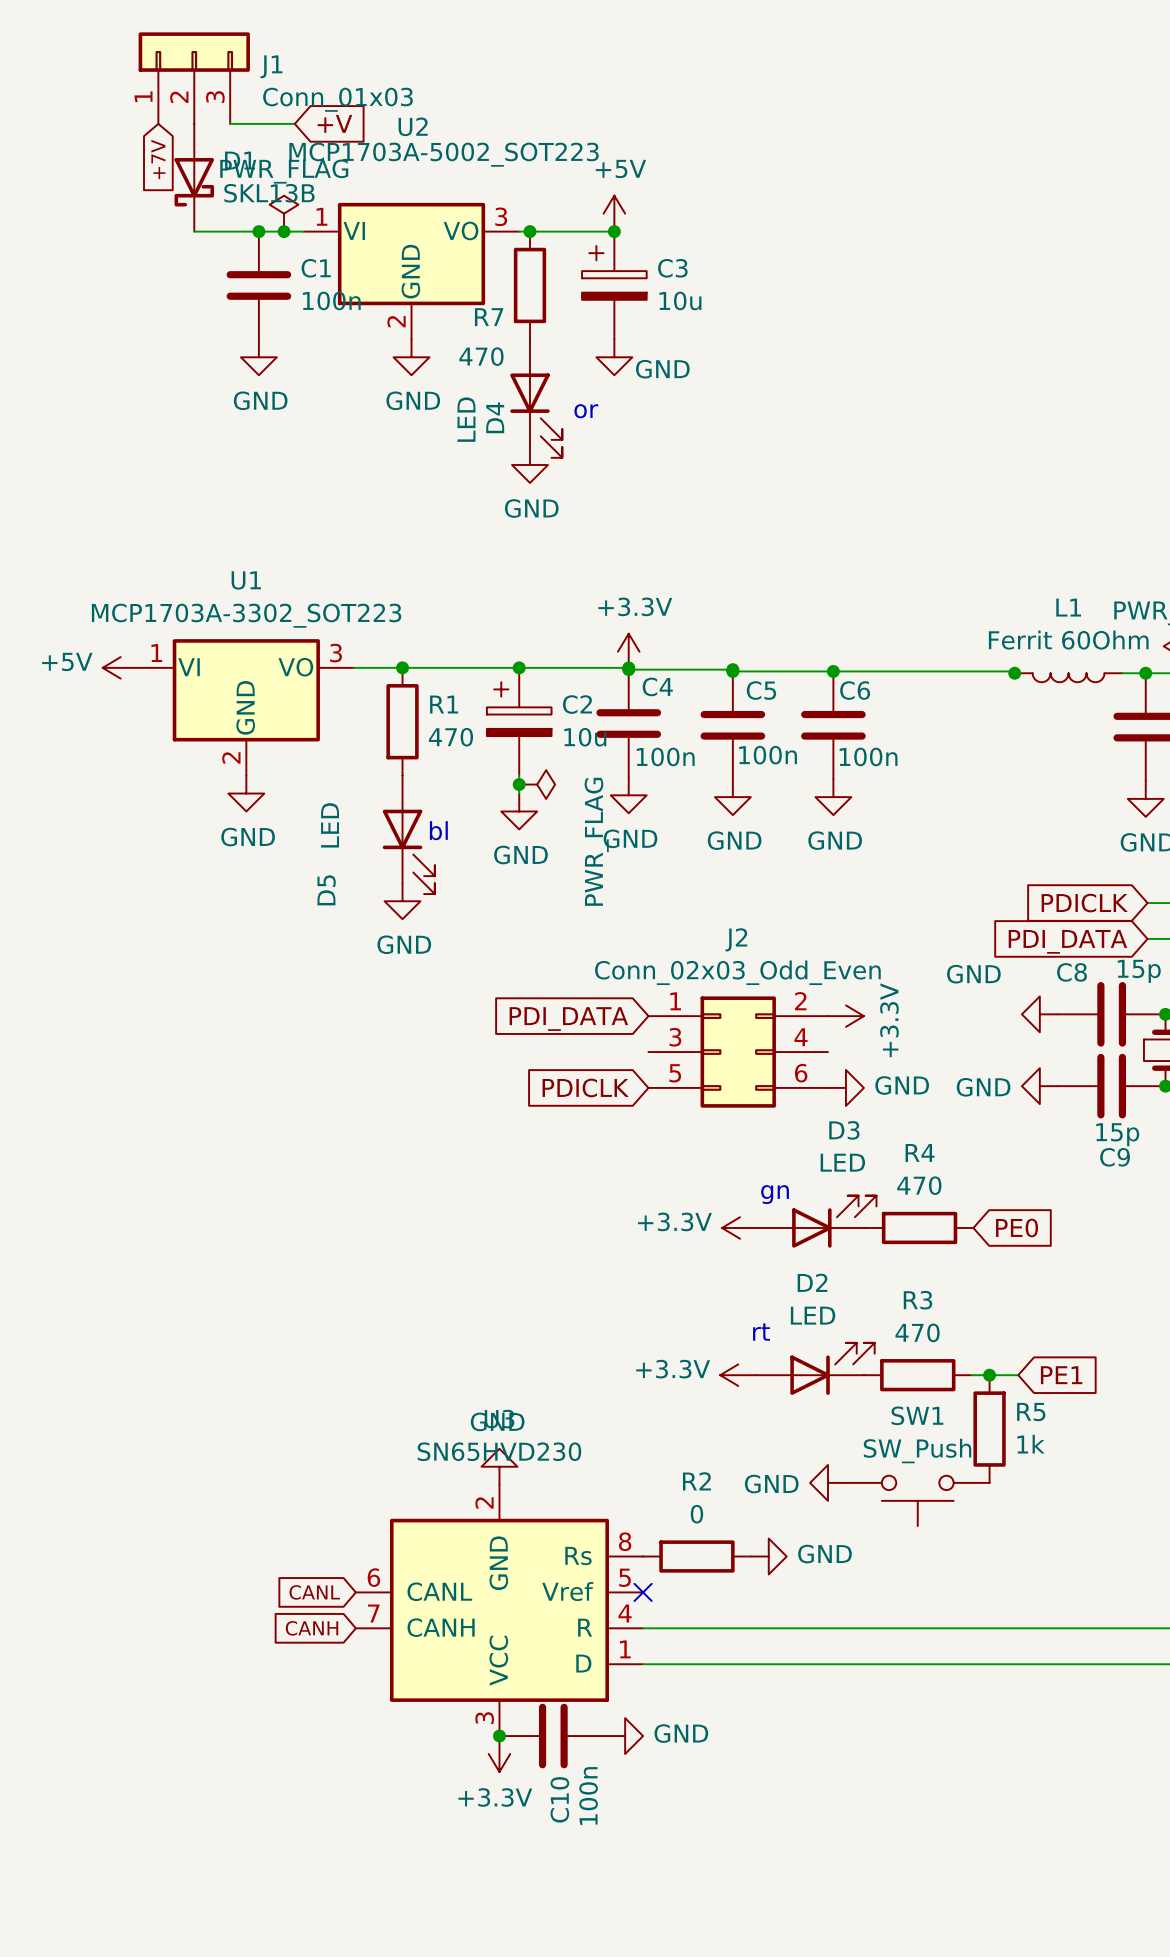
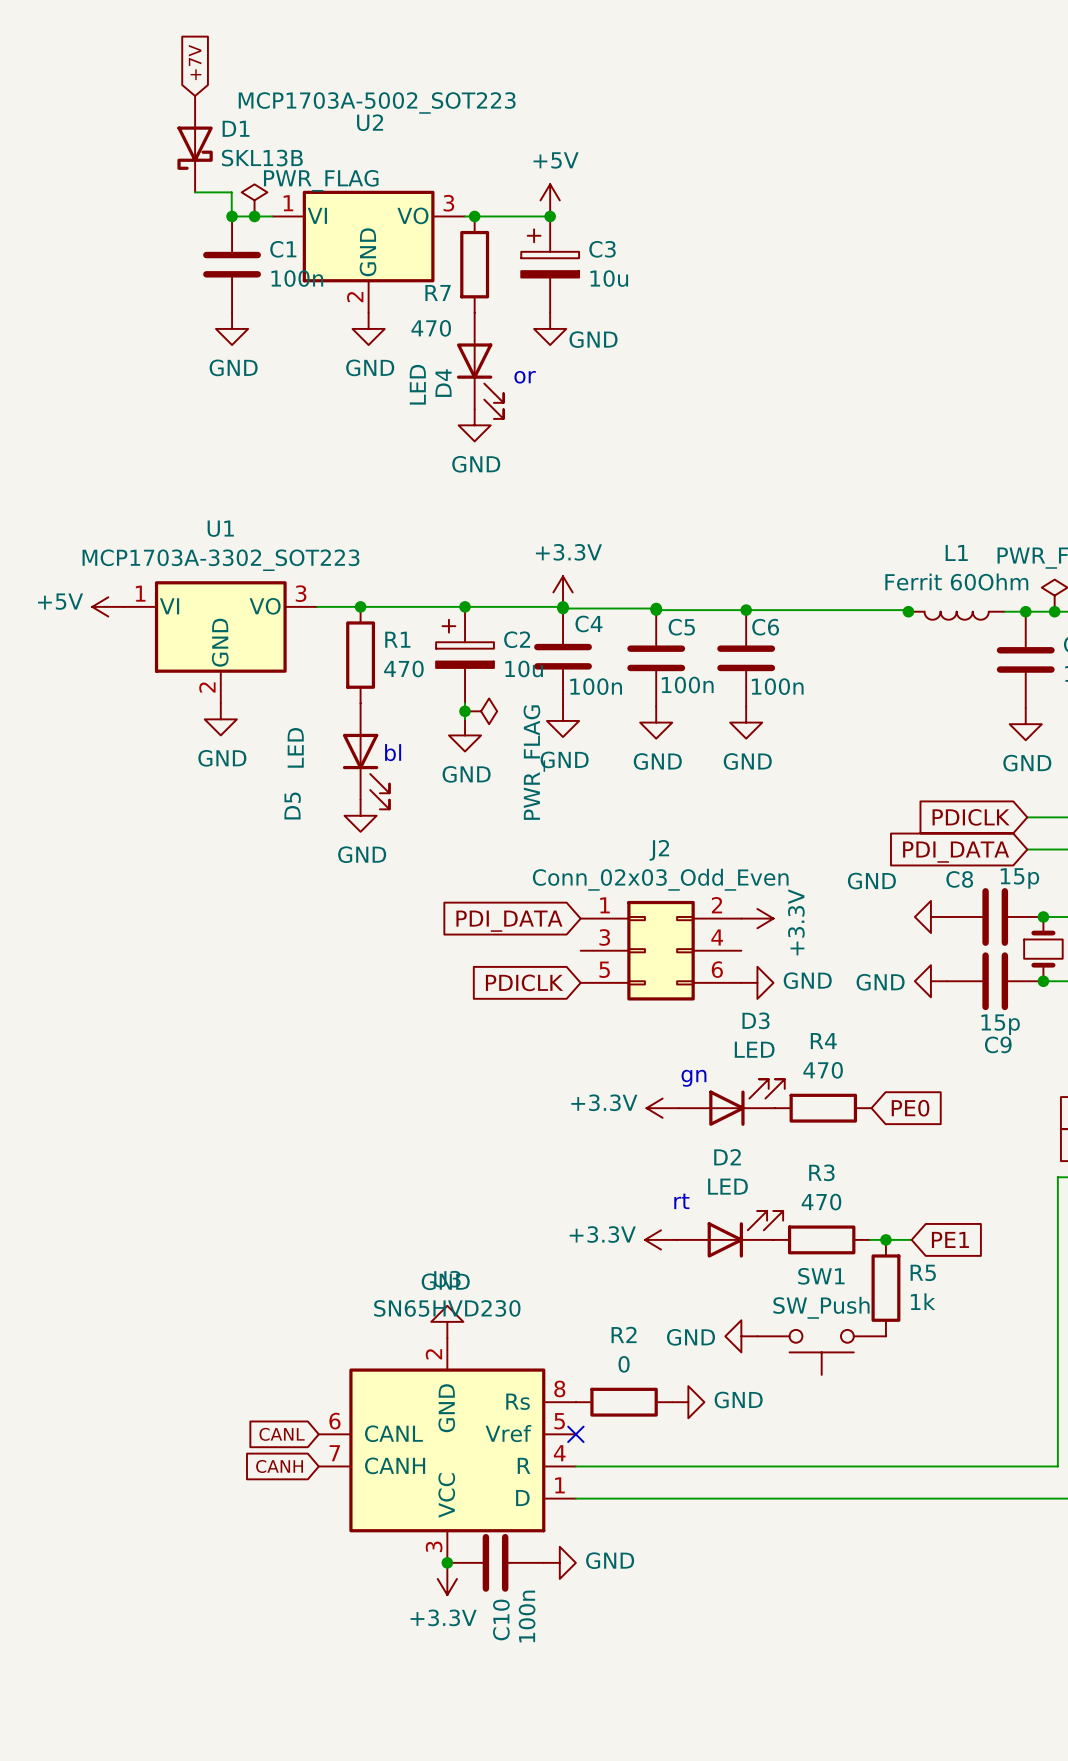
J1: Conn_01x03 (194, 78) -> none
wire: (230, 123) (294, 123) -> none
global label: +V (334, 123) -> none
U2 value position: MCP1703A-5002_SOT223 (444, 154) -> MCP1703A-5002_SOT223 (377, 102)
global label rotation: 0° (158, 159) -> 180° (195, 62)
global label position: +7V (158, 159) -> +7V (195, 62)
power symbol text position: PWR_FLAG (284, 171) -> PWR_FLAG (321, 180)
D1 position: (194, 177) -> (195, 144)
wire: (194, 231) (258, 231) -> (195, 192) (231, 192) (231, 216)

